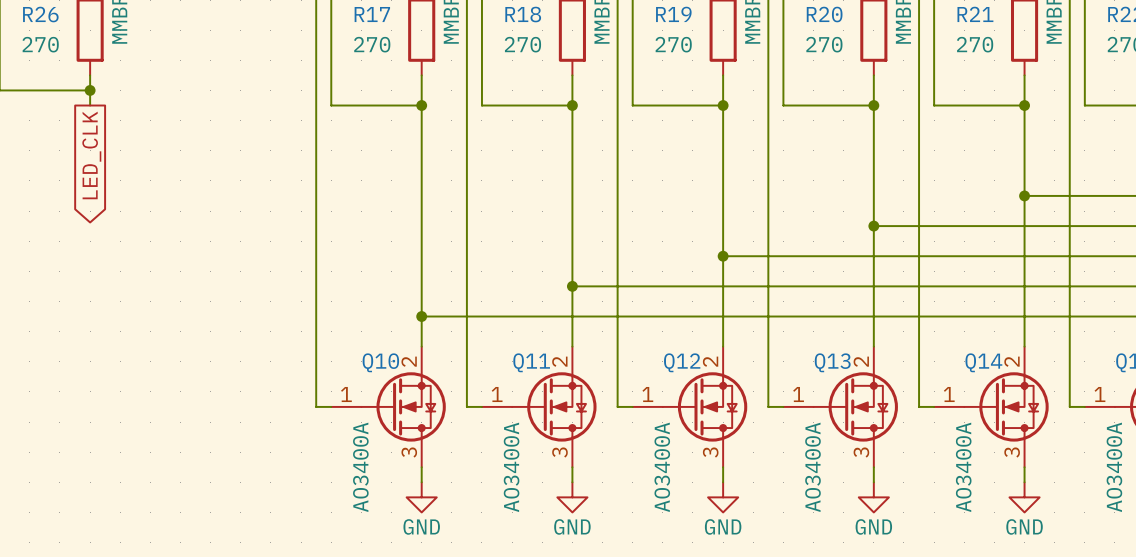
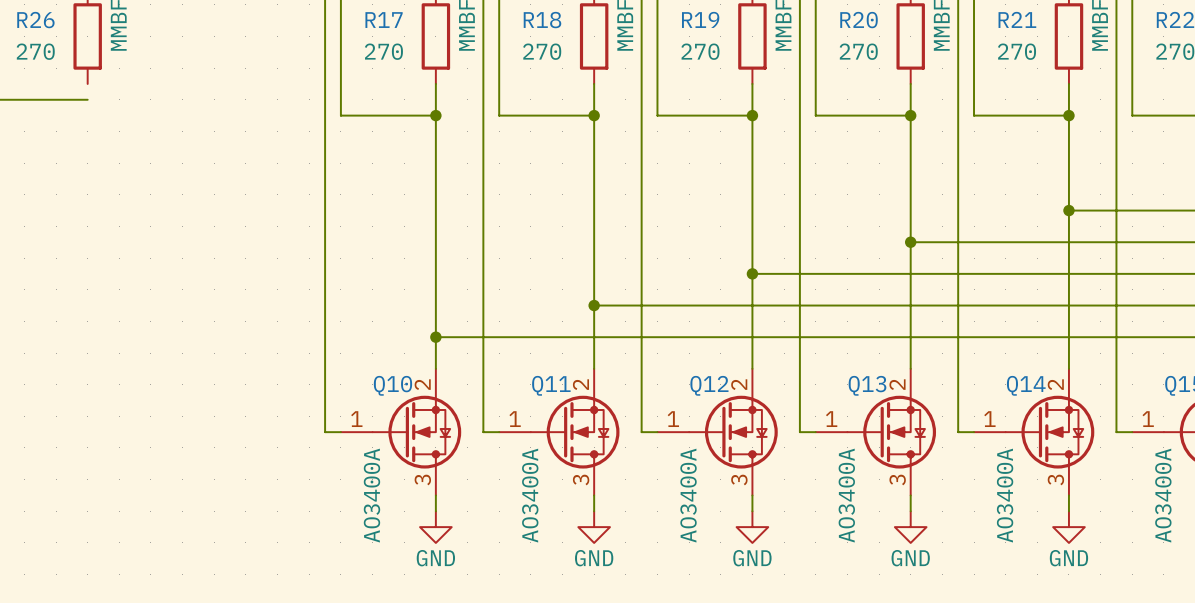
wire: (90, 75) (90, 105) -> none
junction: (90, 90) -> none
global label: LED_CLK (91, 155) -> none

